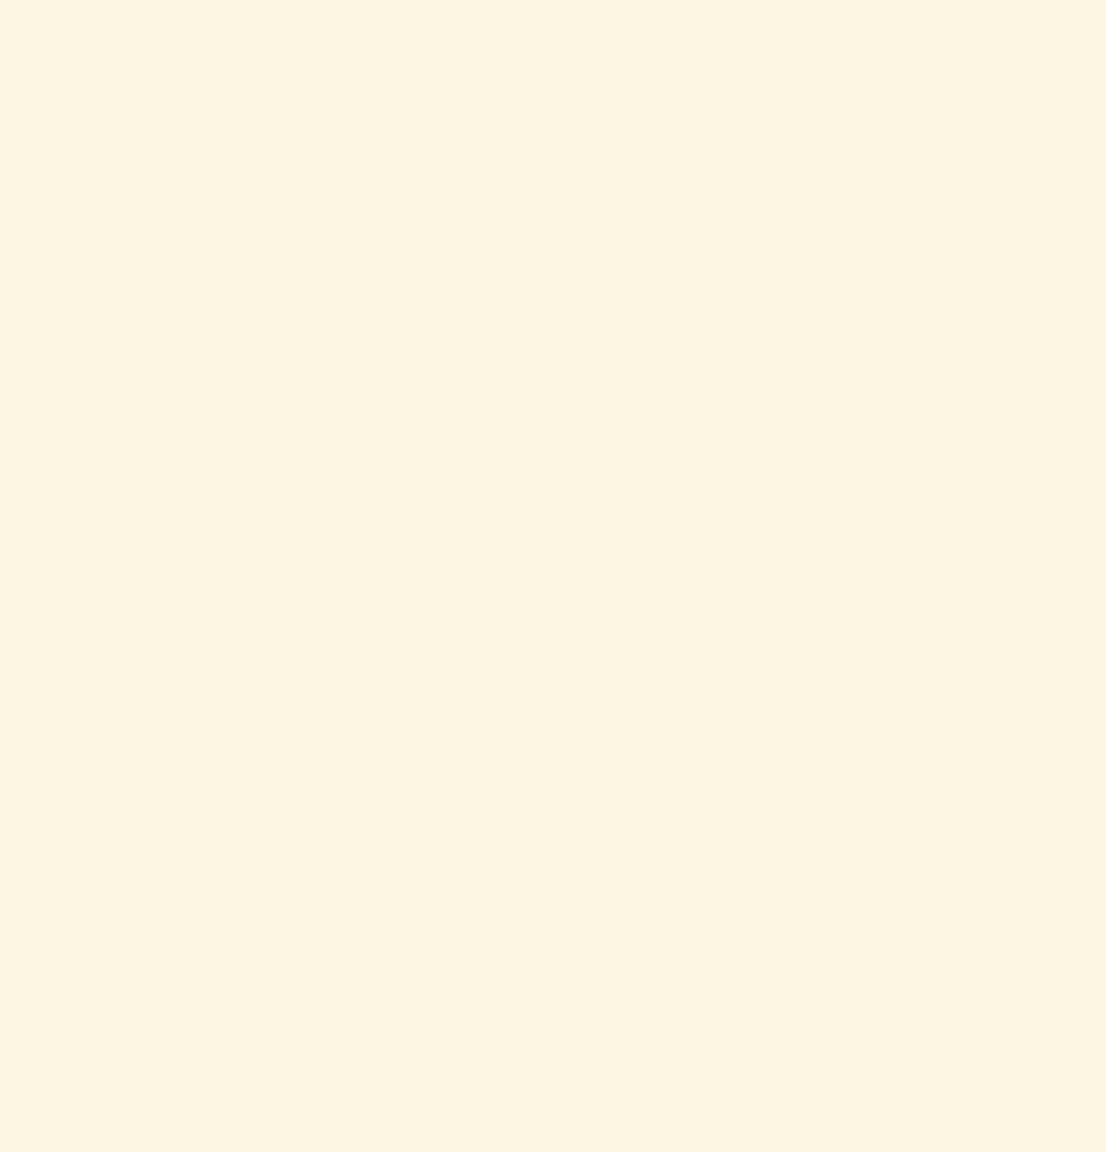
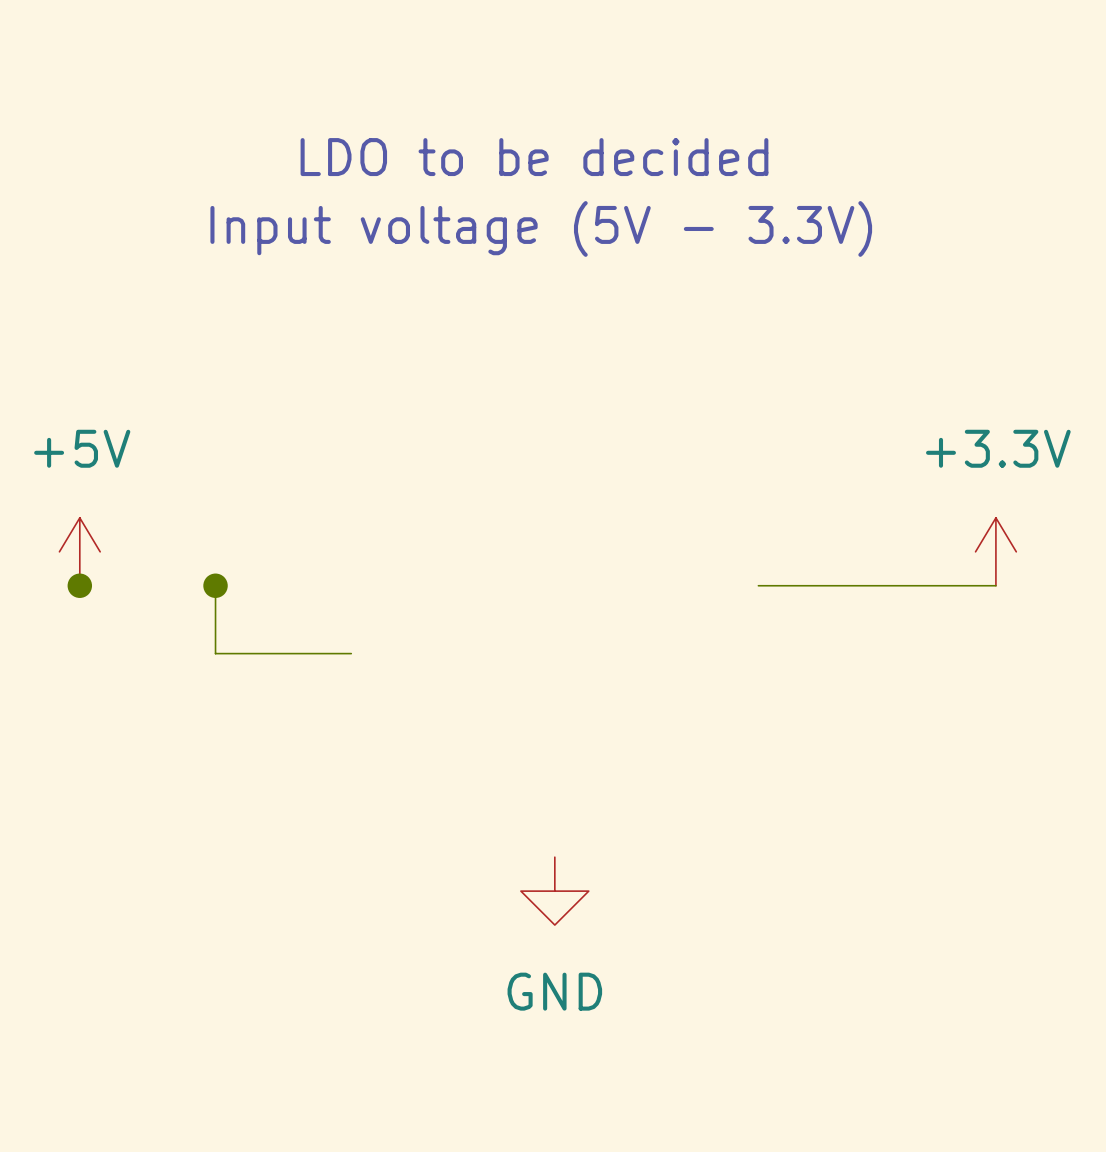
text: none -> LDO to be decided (534, 157)
text: none -> Input voltage (5V - 3.3V) (541, 228)
power symbol: none -> +5V (79, 551)
power symbol: none -> +3.3V (995, 551)
junction: none -> (79, 585)
wire: none -> (215, 585) (215, 653) (351, 653)
junction: none -> (215, 585)
wire: none -> (758, 585) (995, 585)
power symbol: none -> GND (554, 891)

